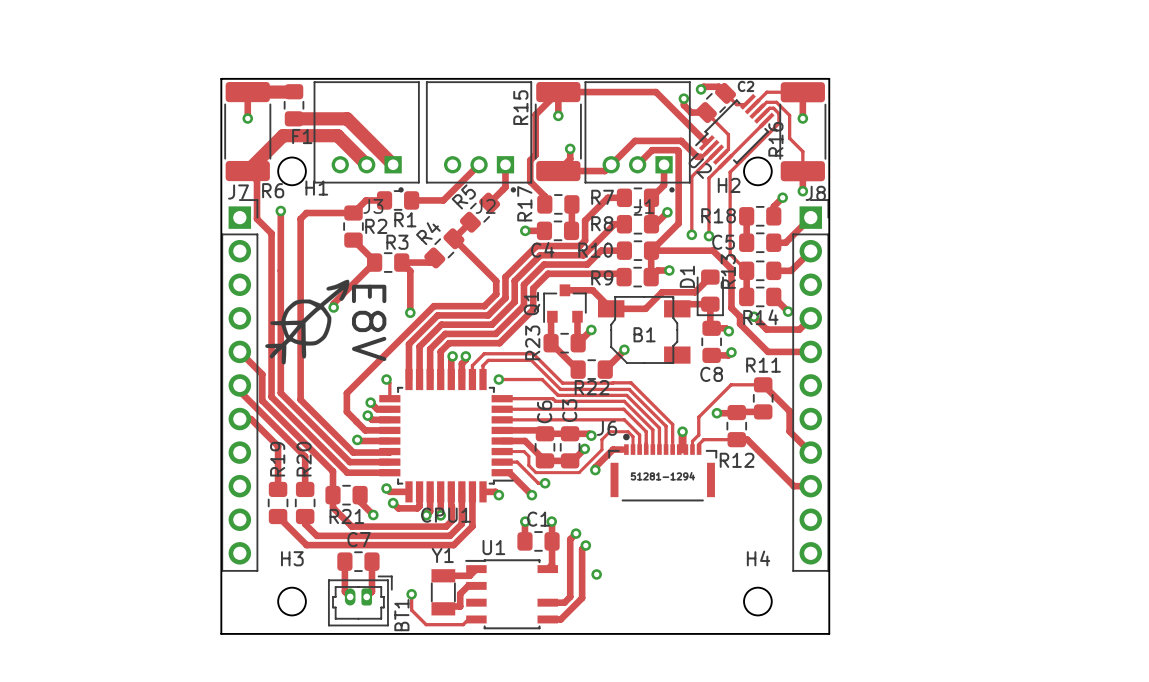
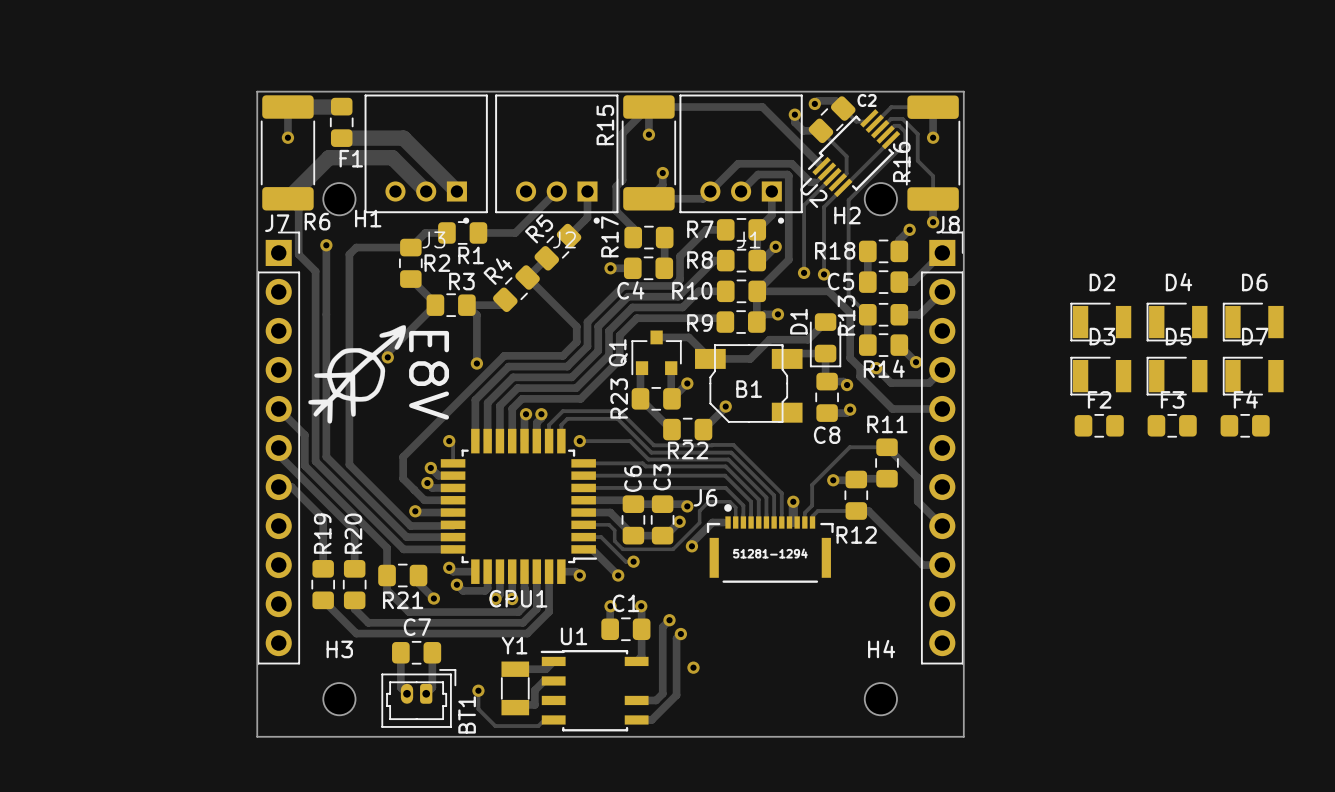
D2: none -> (1100, 322)
D4: none -> (1177, 322)
D6: none -> (1253, 322)
D3: none -> (1100, 376)
D5: none -> (1177, 376)
D7: none -> (1253, 376)
F2: none -> (1099, 425)
F3: none -> (1172, 425)
F4: none -> (1245, 425)

